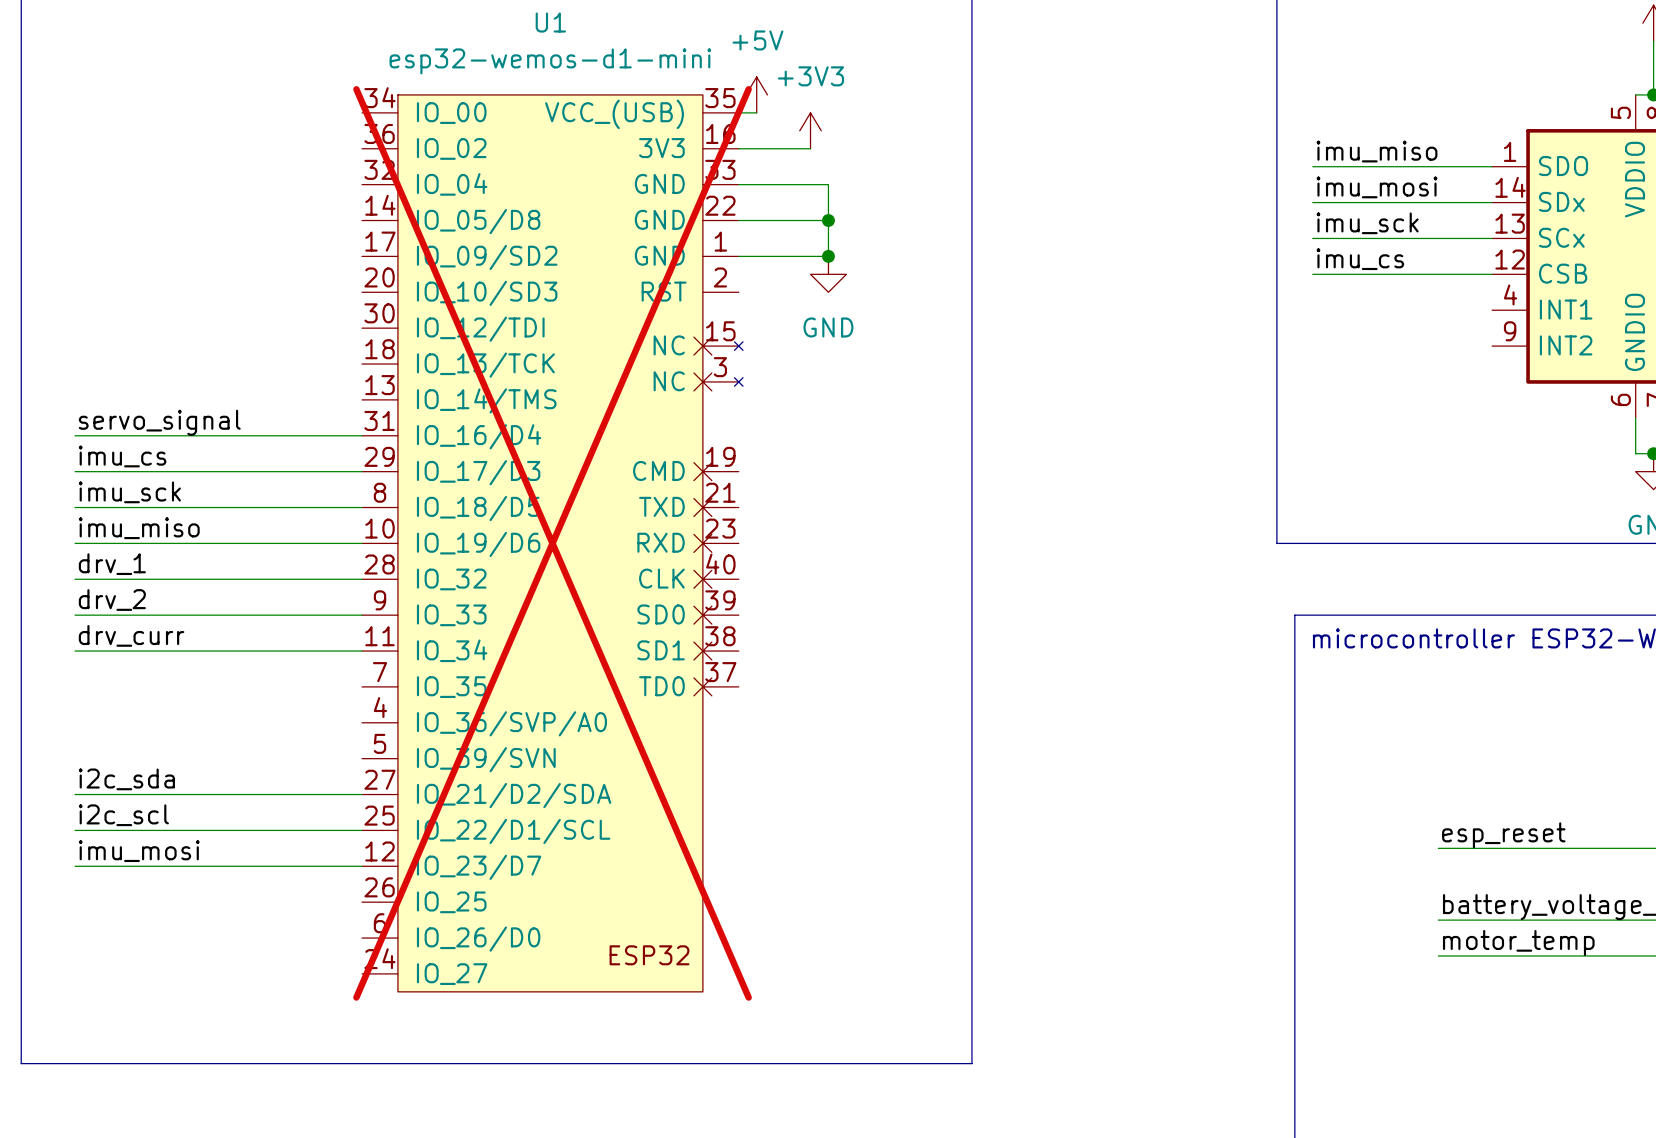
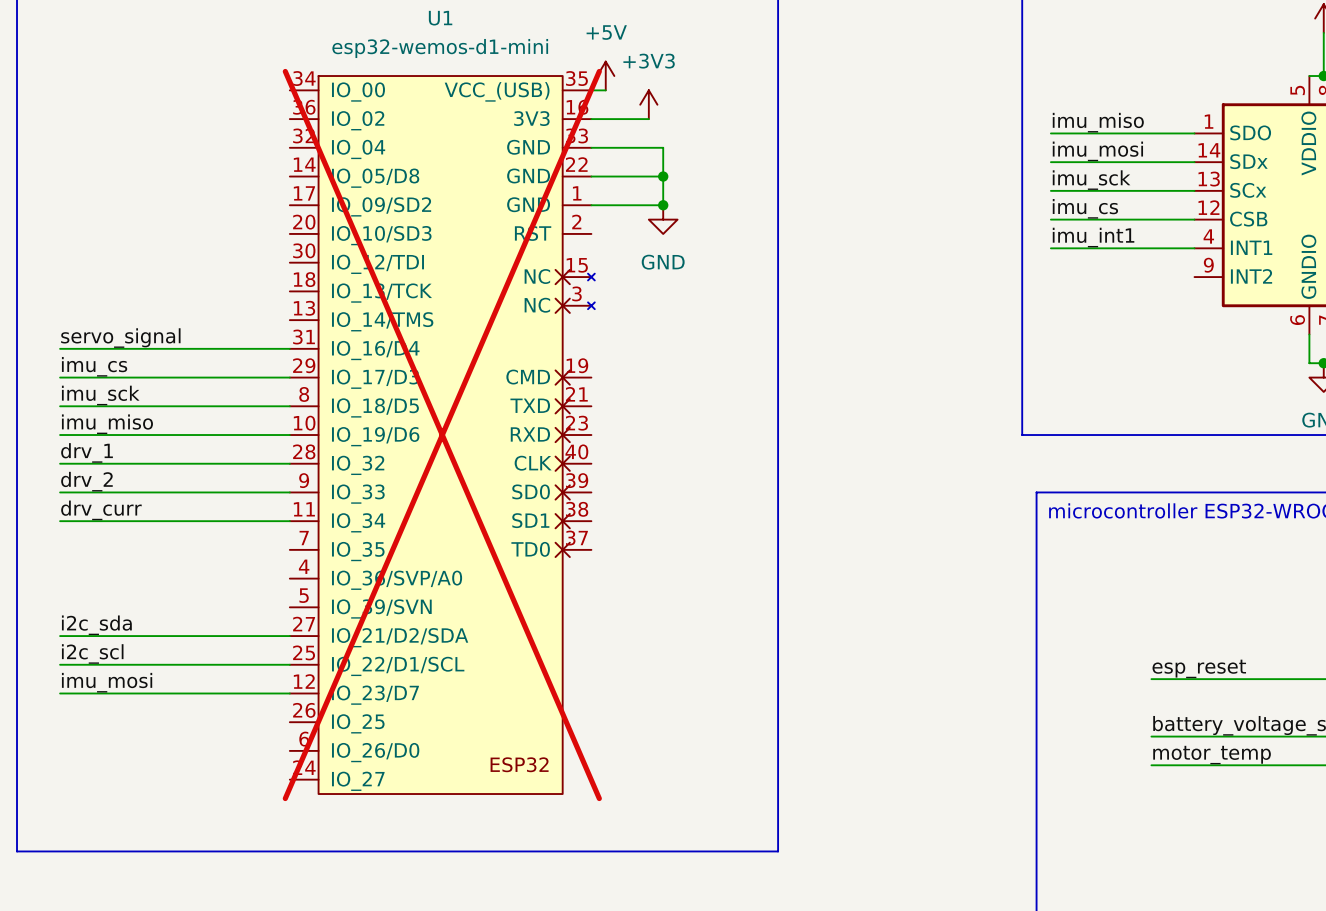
label: none -> imu_int1 (1093, 237)
wire: none -> (1050, 248) (1194, 248)

